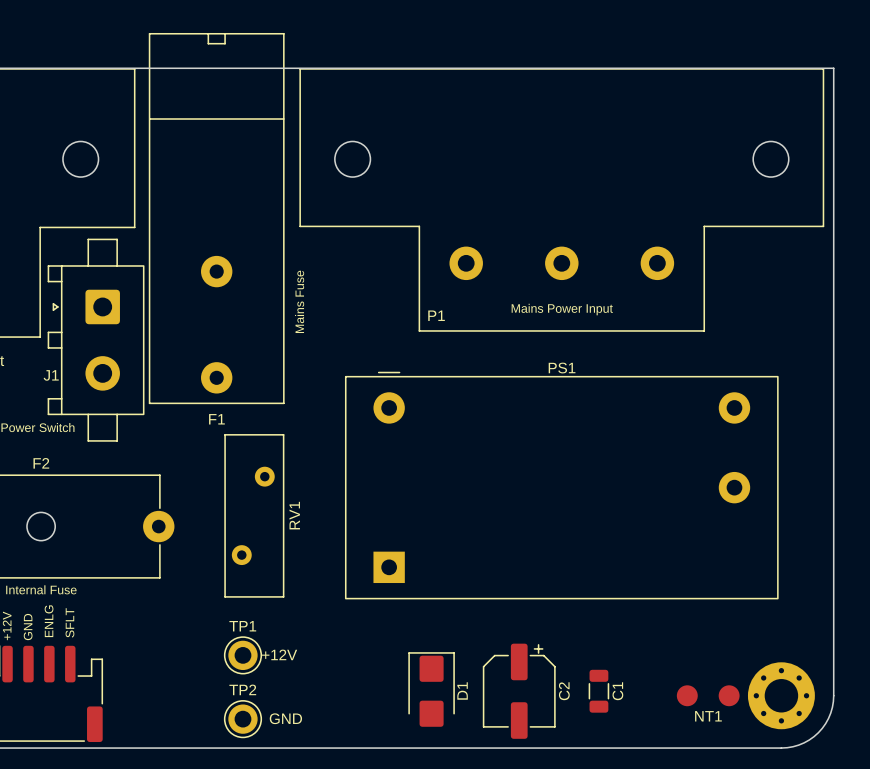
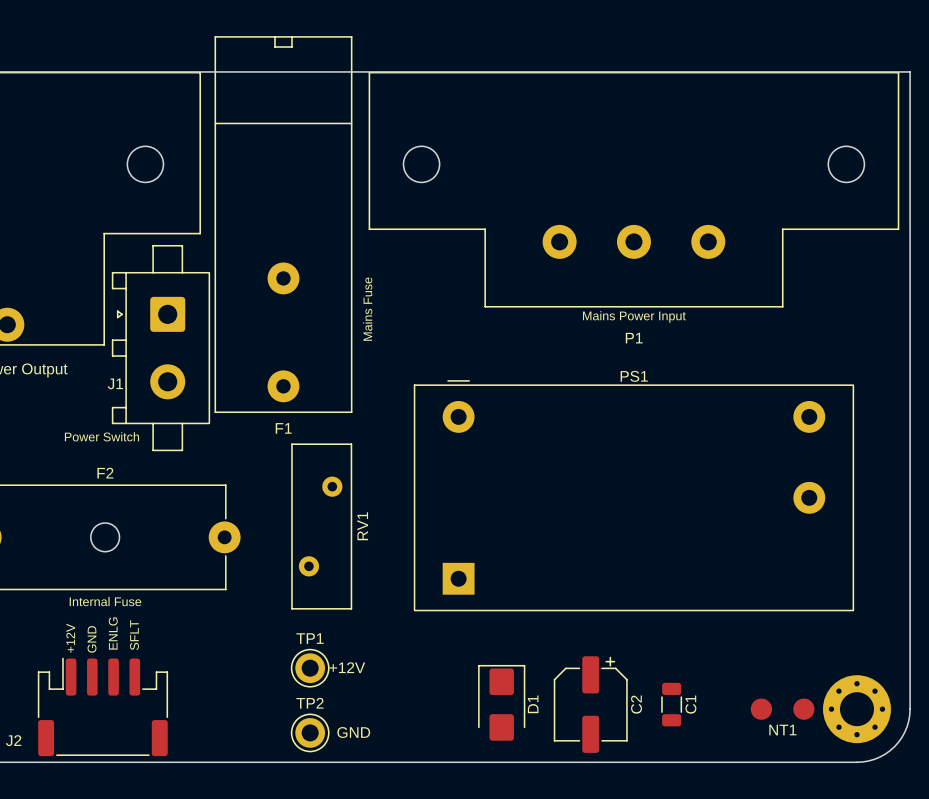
P1 footprint: [299, 68, 825, 332] -> [368, 71, 900, 308]
P1 name position: P1 (436, 315) -> P1 (634, 338)

